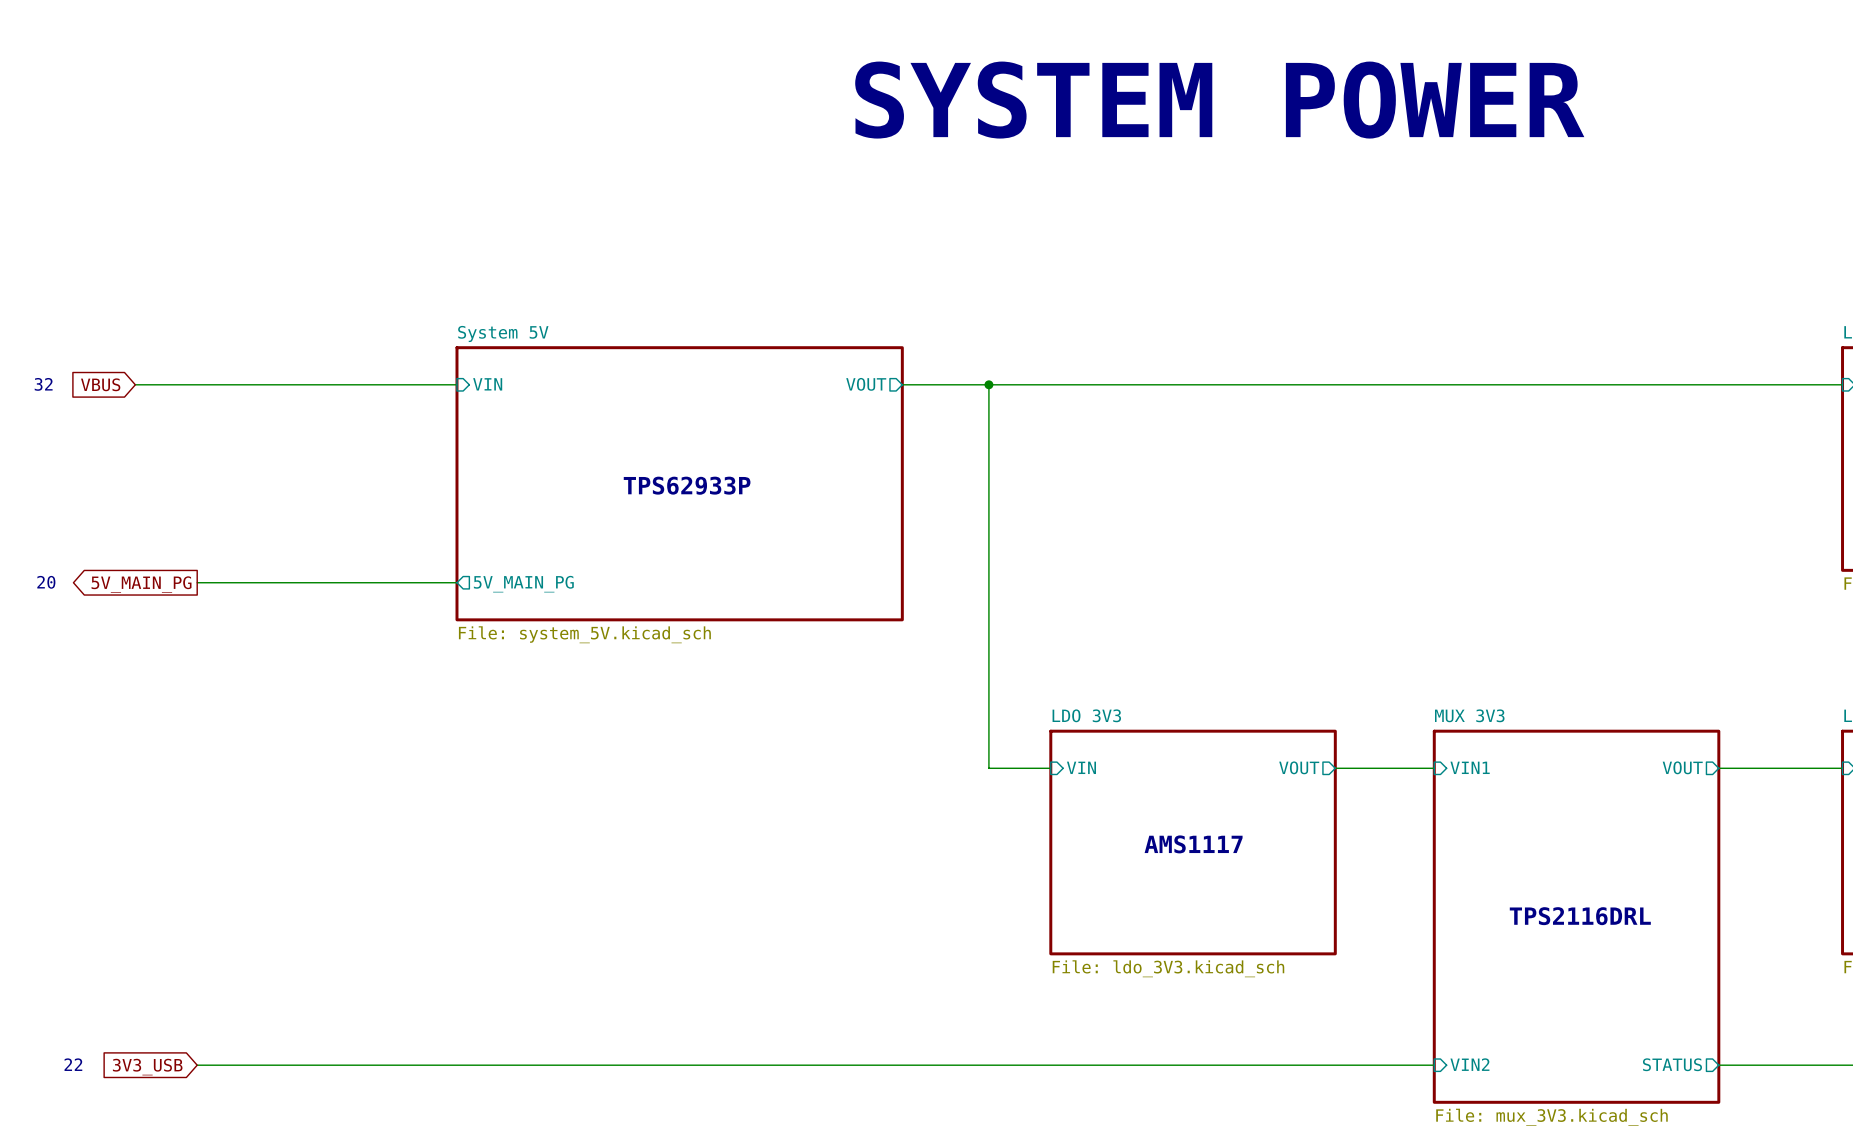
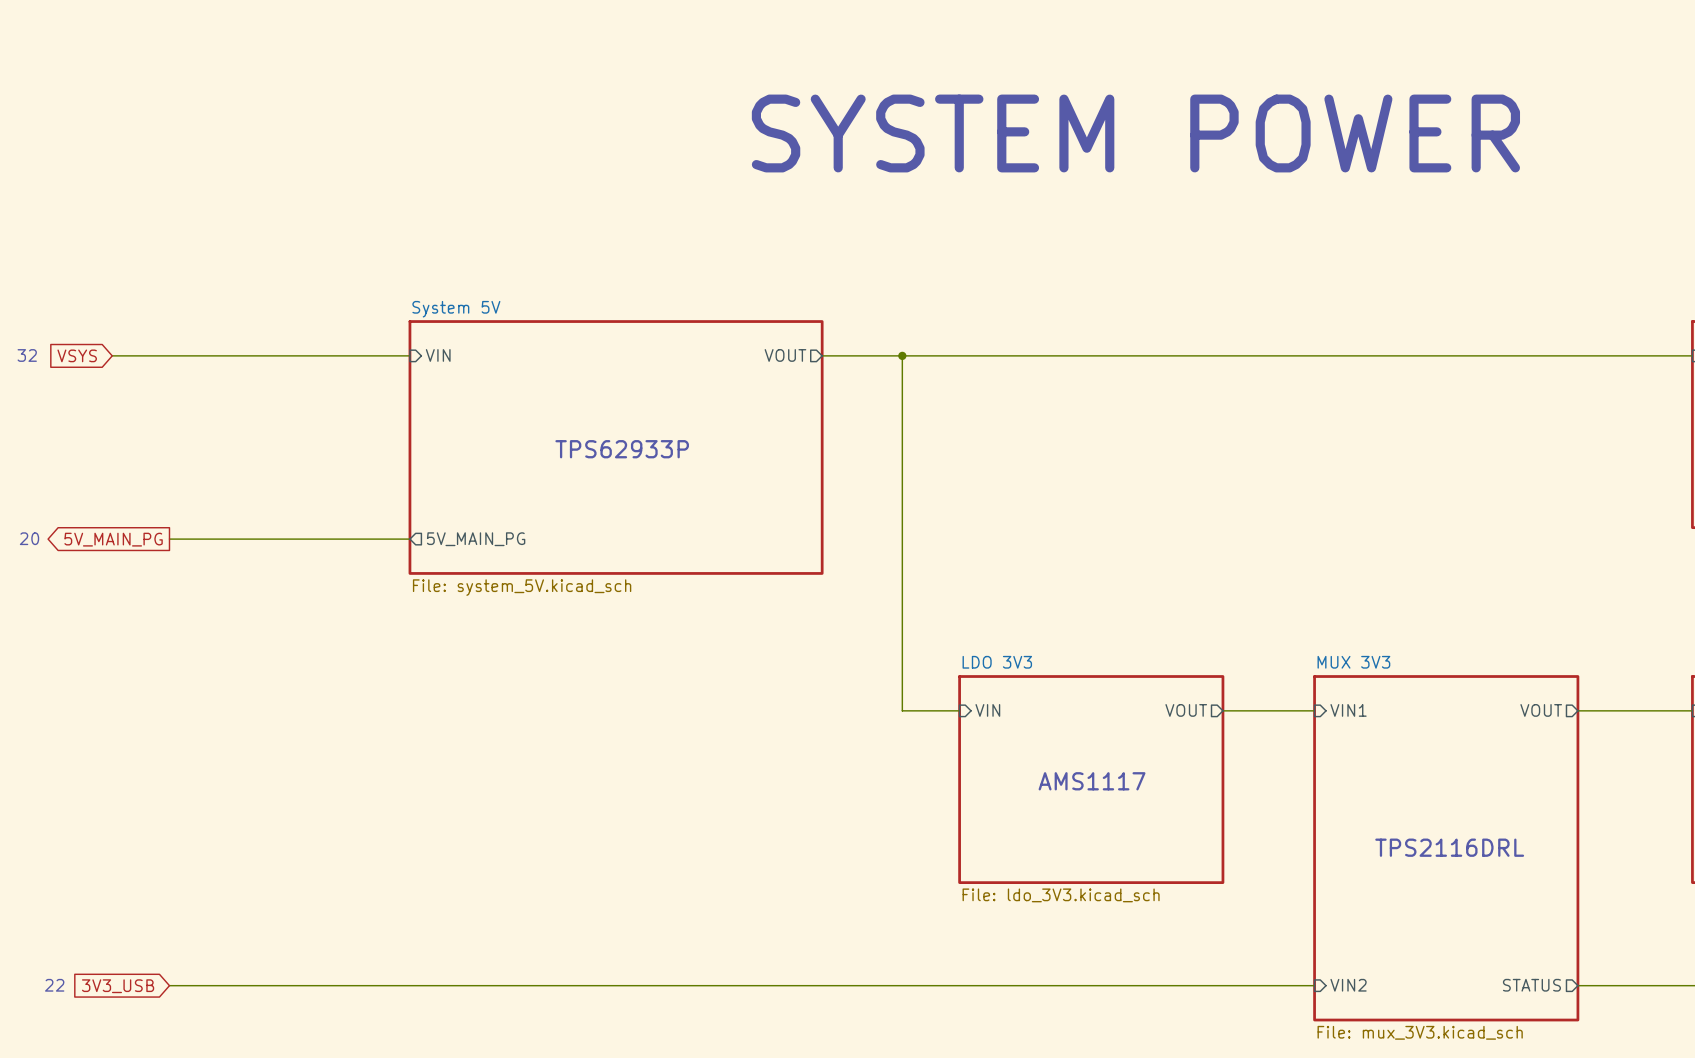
text position: SYSTEM POWER (1219, 100) -> SYSTEM POWER (1135, 133)
global label: VBUS (100, 384) -> VSYS (77, 355)

